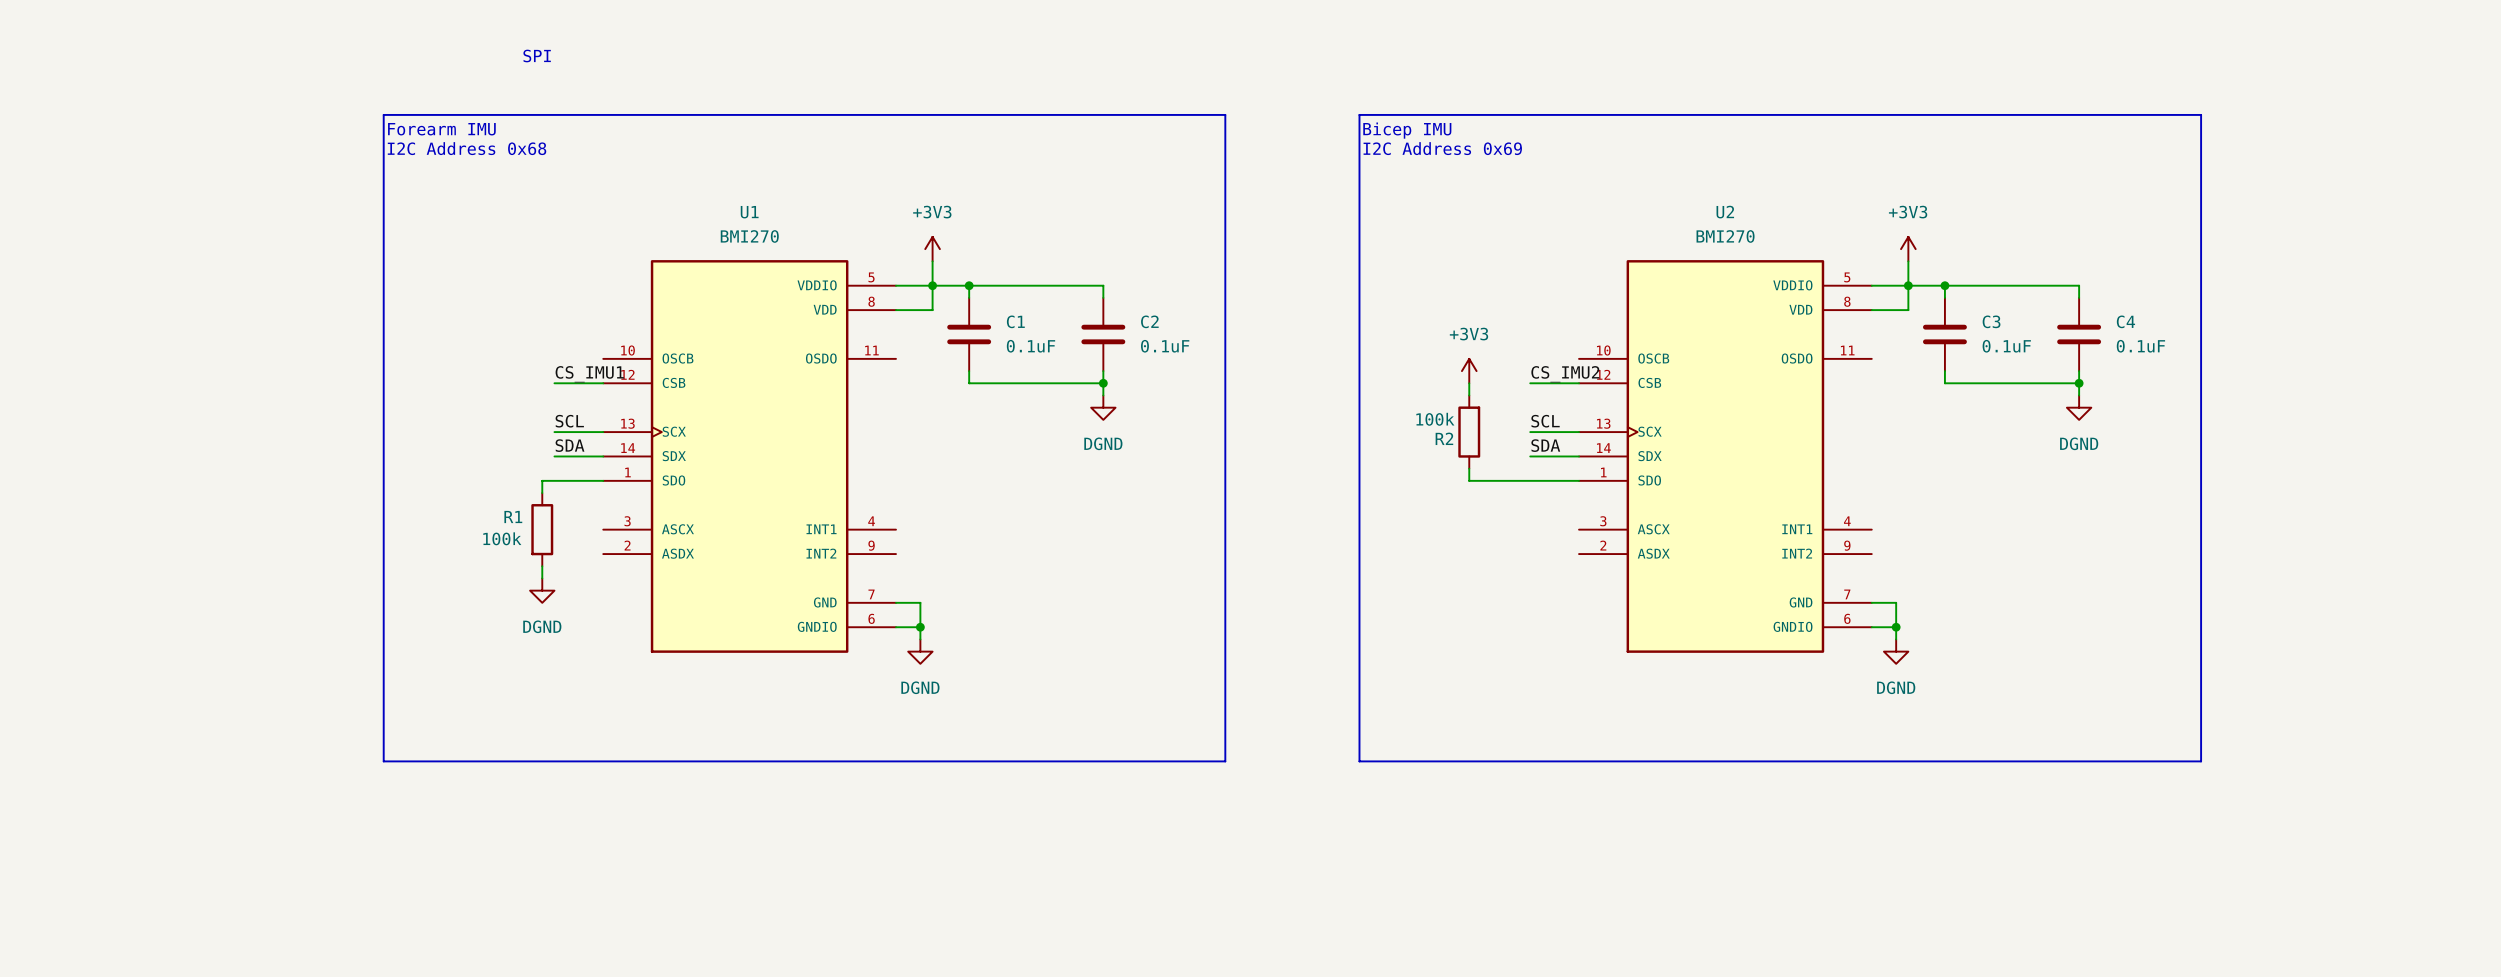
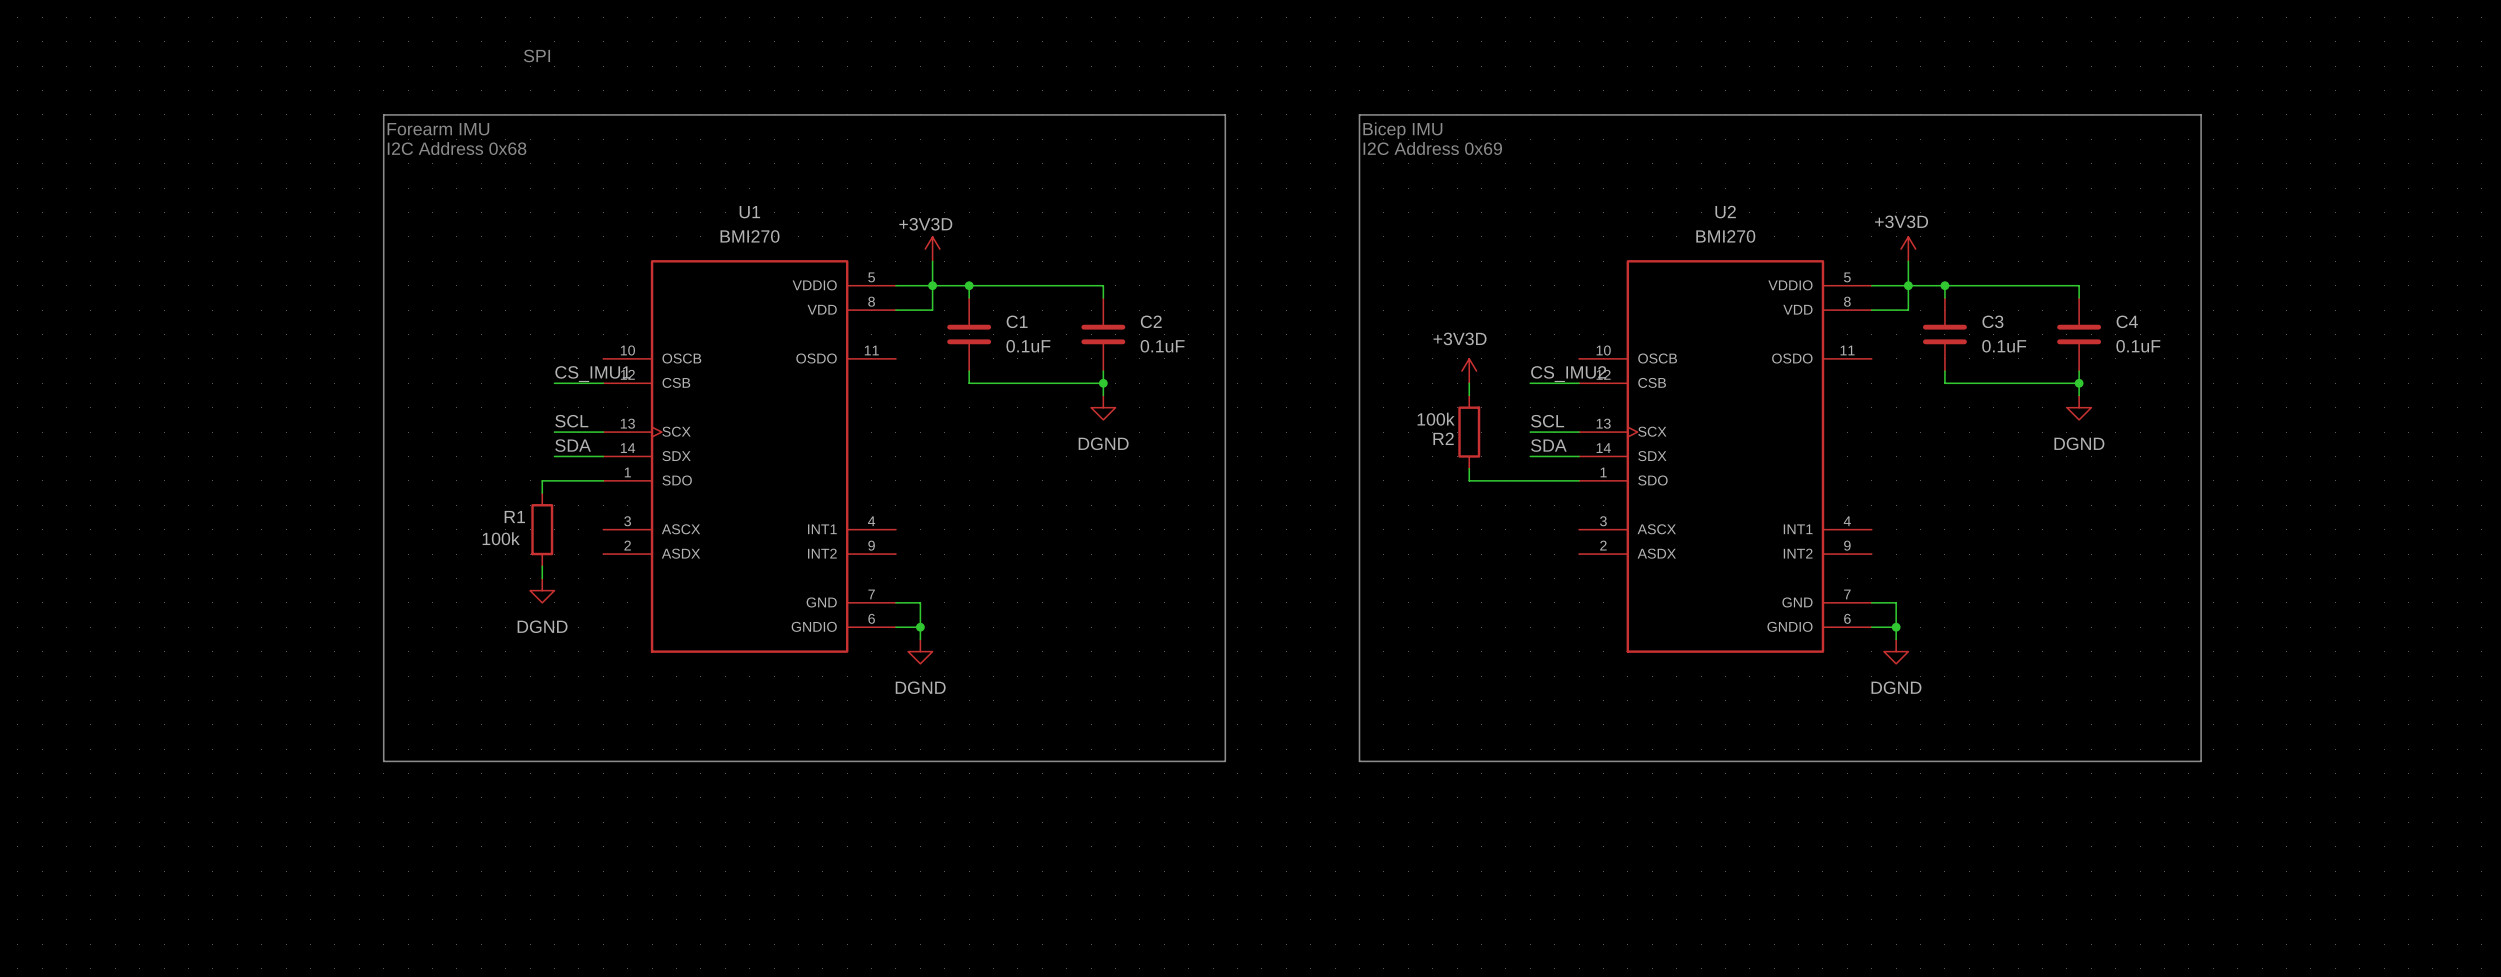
power symbol: +3V3 (932, 249) -> +3V3D (932, 249)
power symbol: +3V3 (1908, 249) -> +3V3D (1908, 249)
power symbol: +3V3 (1469, 371) -> +3V3D (1469, 371)

